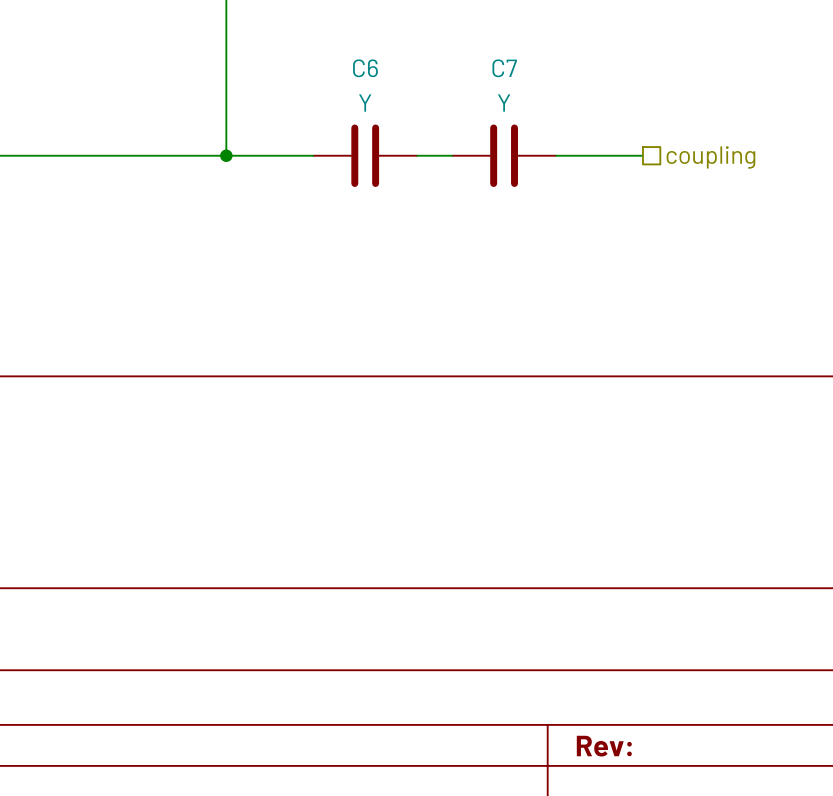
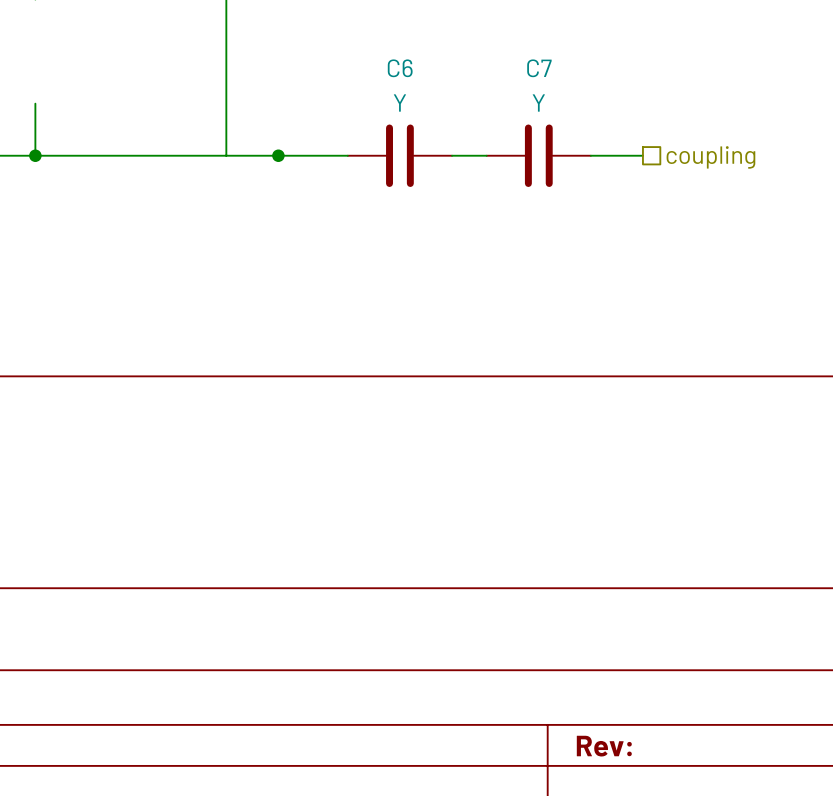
wire: none -> (35, 103) (35, 155)
junction: none -> (35, 155)
junction position: (226, 155) -> (278, 155)
C6 position: (365, 155) -> (399, 155)
C7 position: (504, 155) -> (538, 155)

